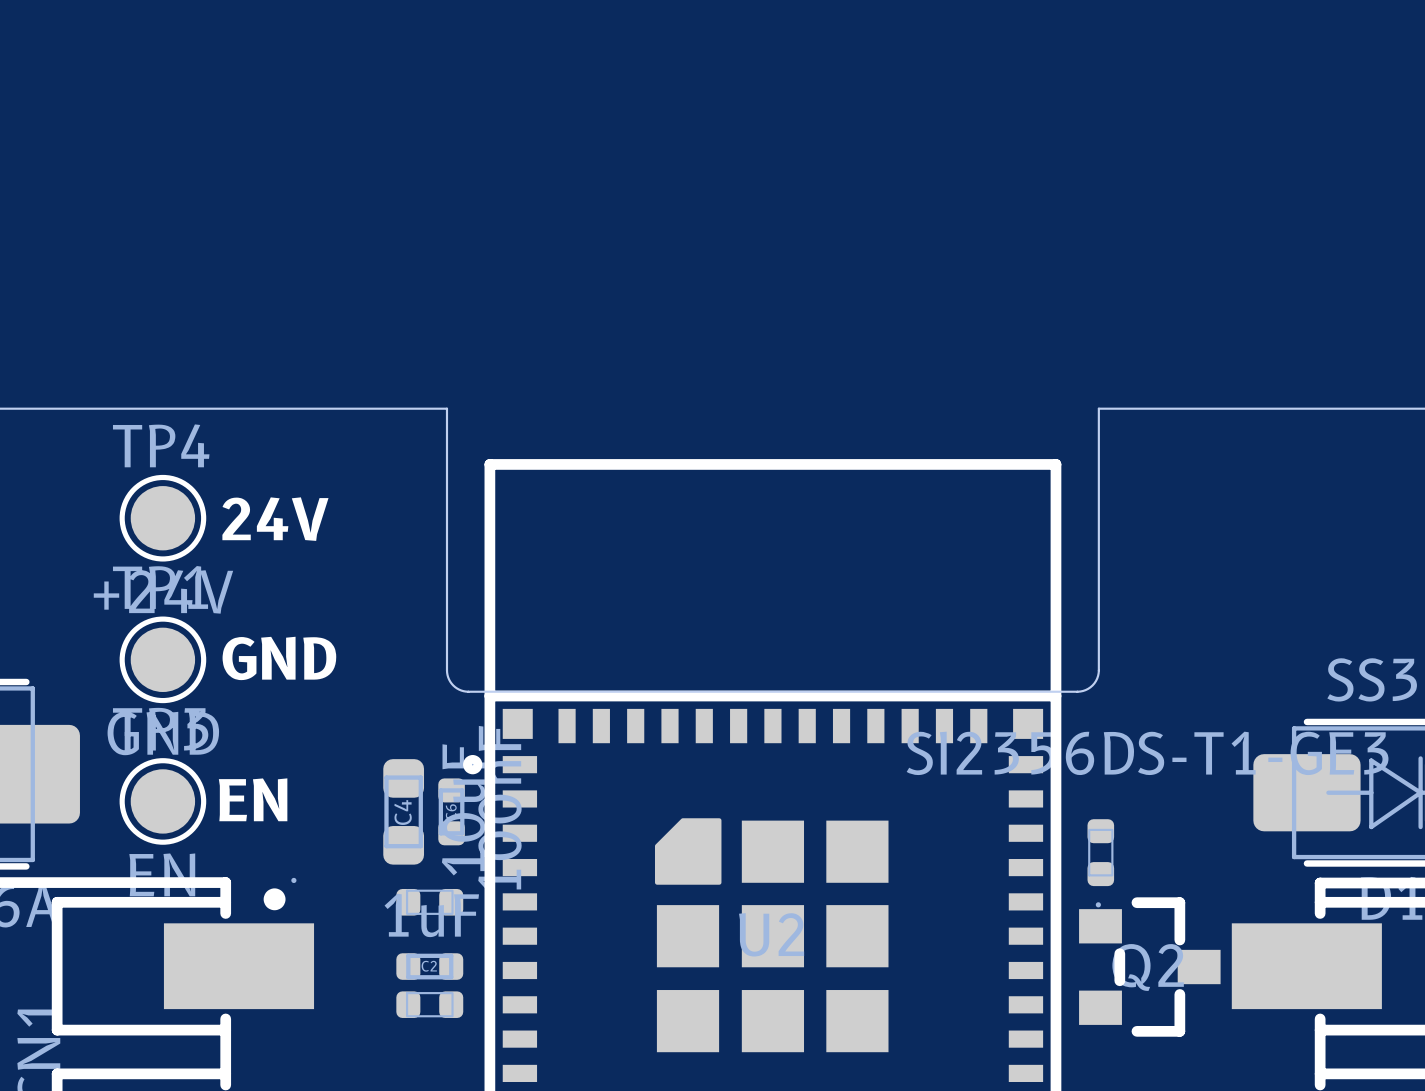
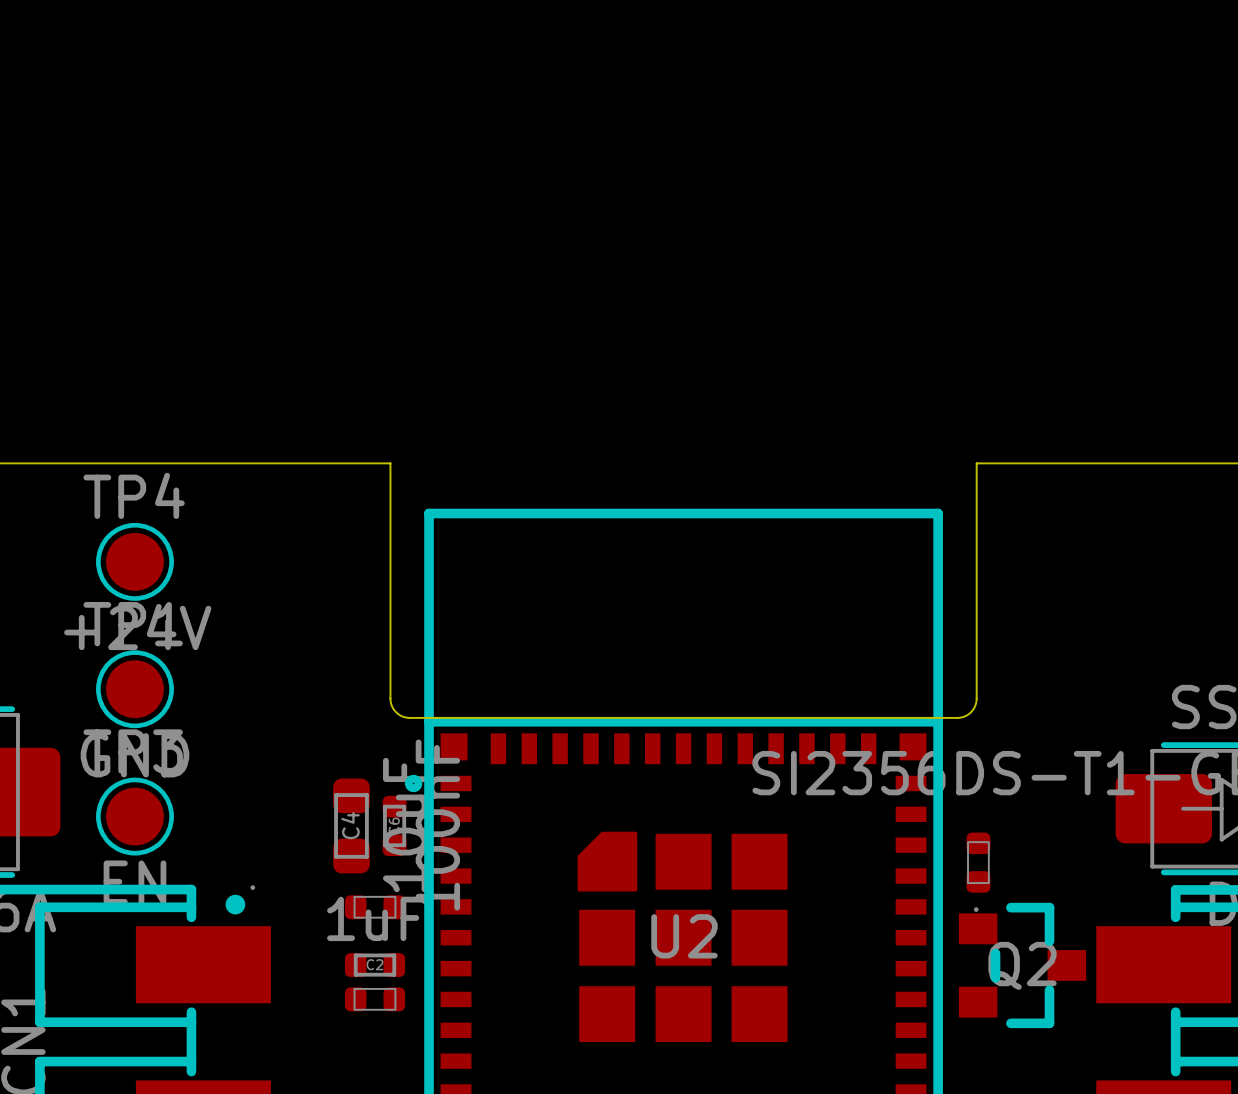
text: 24V (275, 519) -> none
text: GND (279, 658) -> none
text: EN (253, 799) -> none

